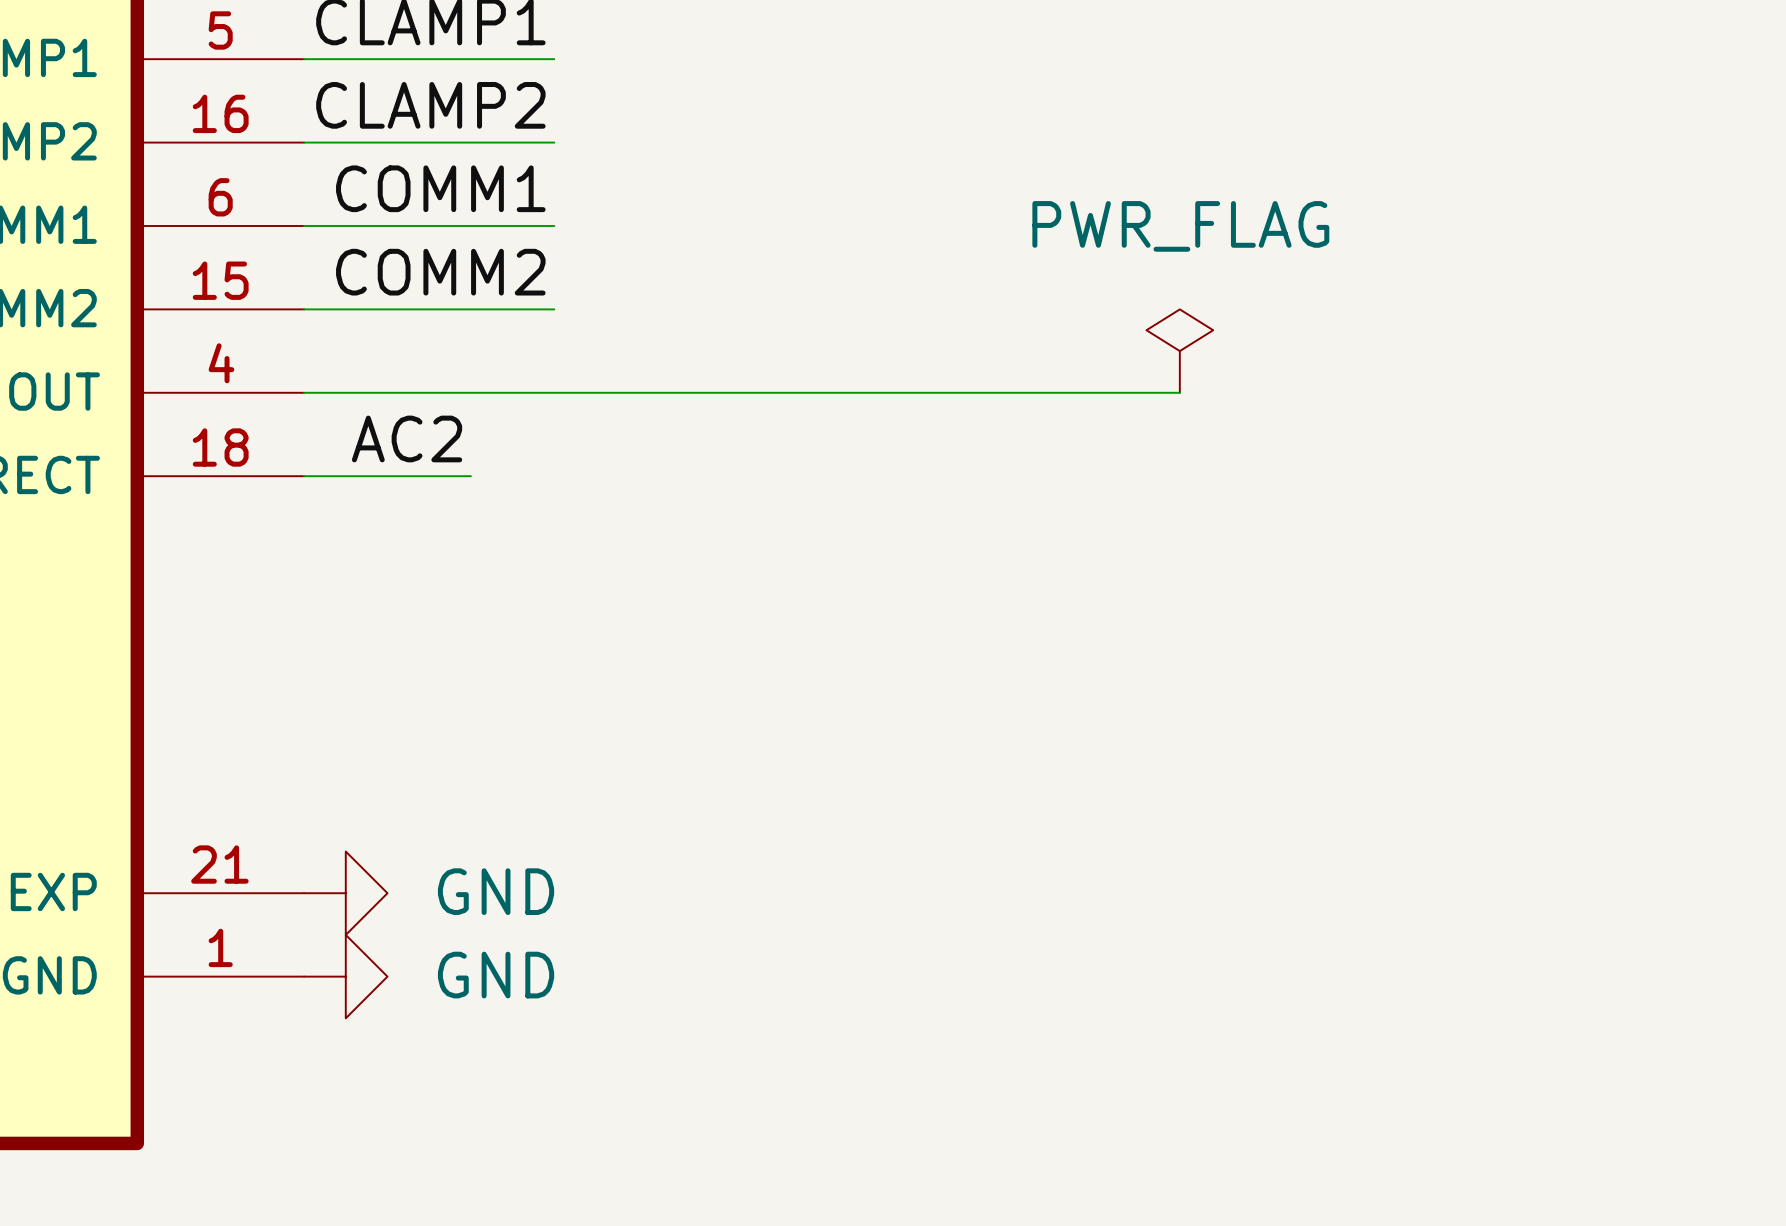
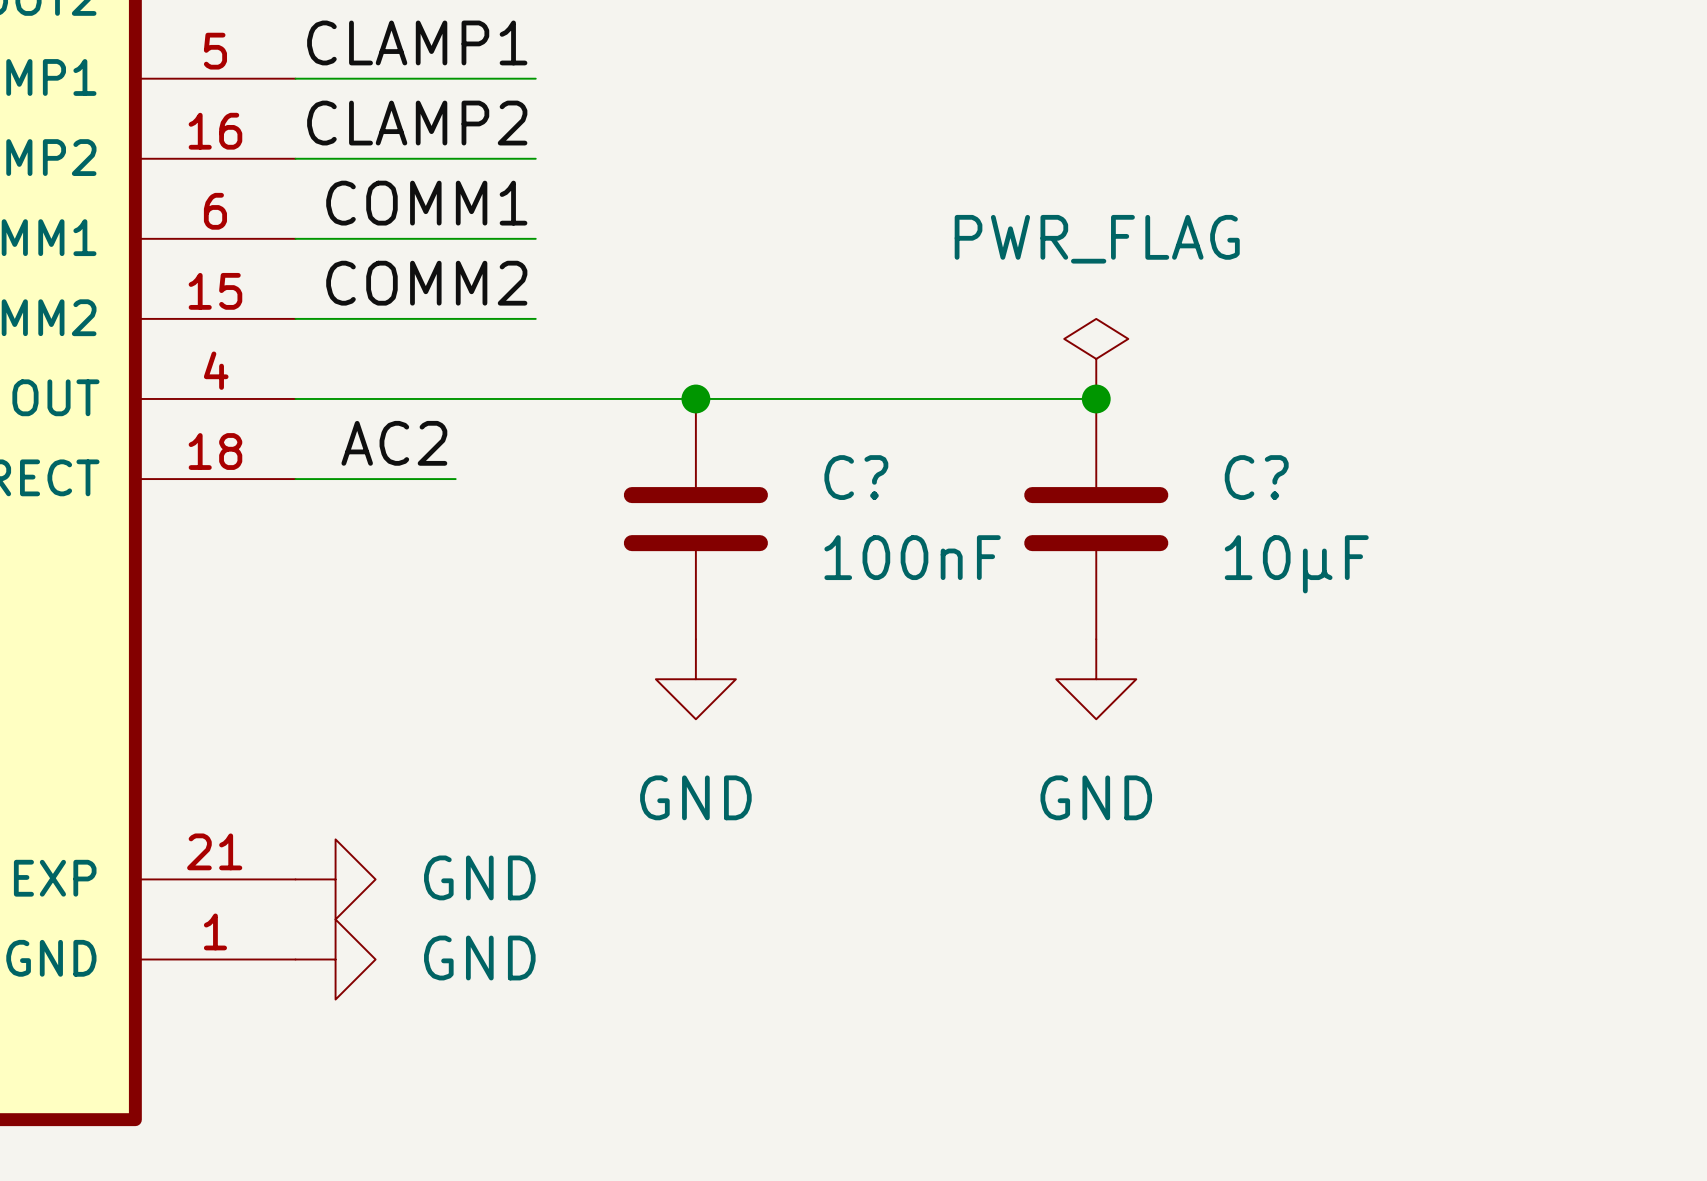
power symbol position: PWR_FLAG (1179, 351) -> PWR_FLAG (1096, 358)
junction: none -> (695, 398)
wire: (1138, 392) (1179, 392) -> none
junction: none -> (1096, 398)
C?: none -> 100nF (695, 519)
C?: none -> 10µF (1096, 519)
power symbol: none -> GND (695, 679)
power symbol: none -> GND (1096, 679)

